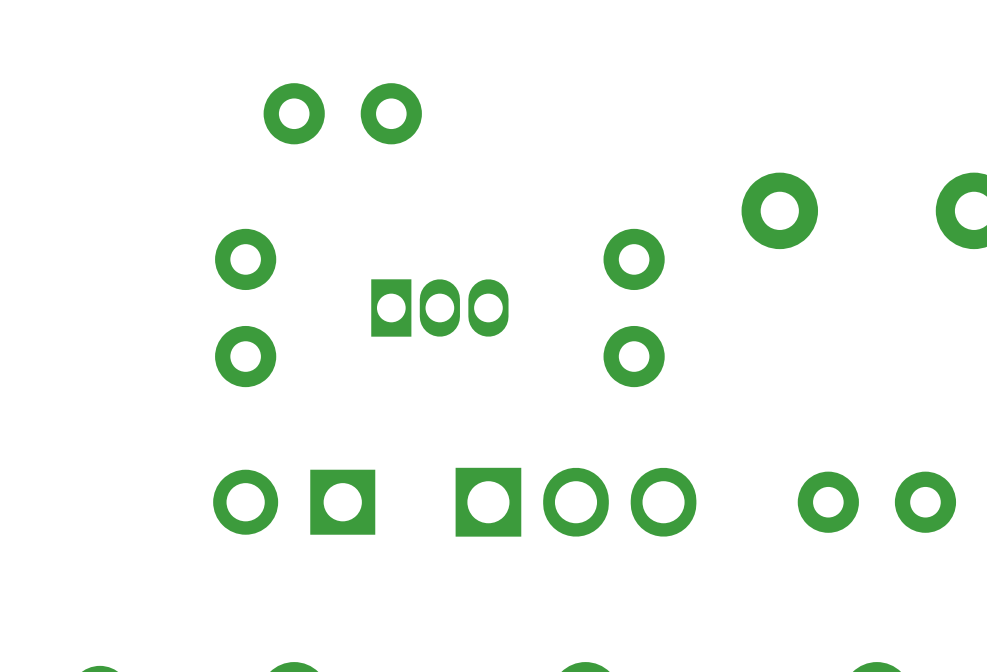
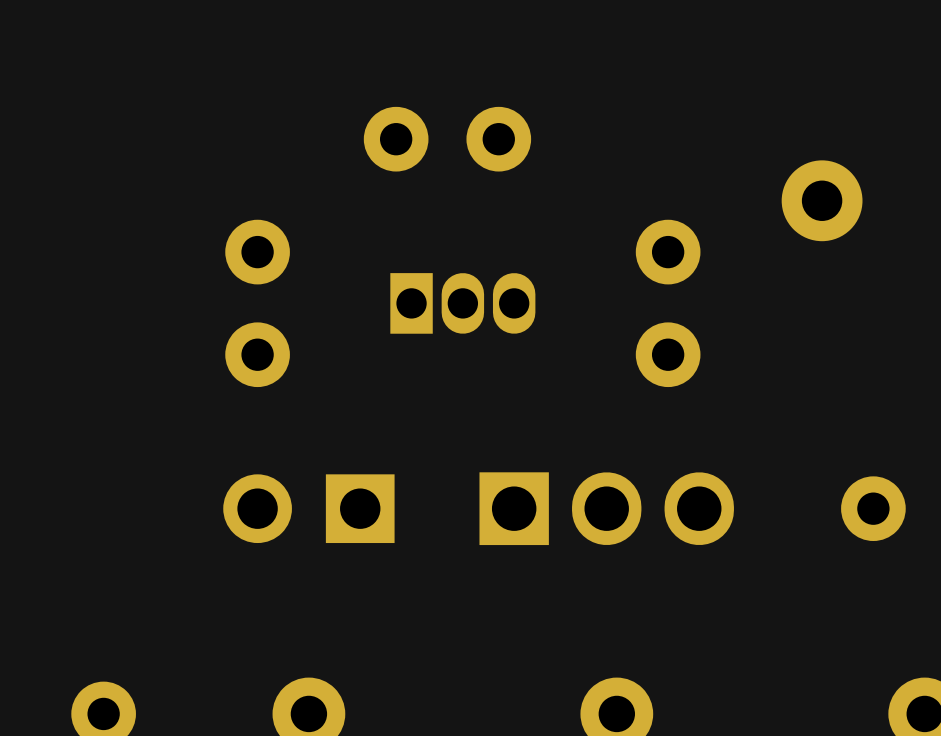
part position: (342, 113) -> (447, 139)

